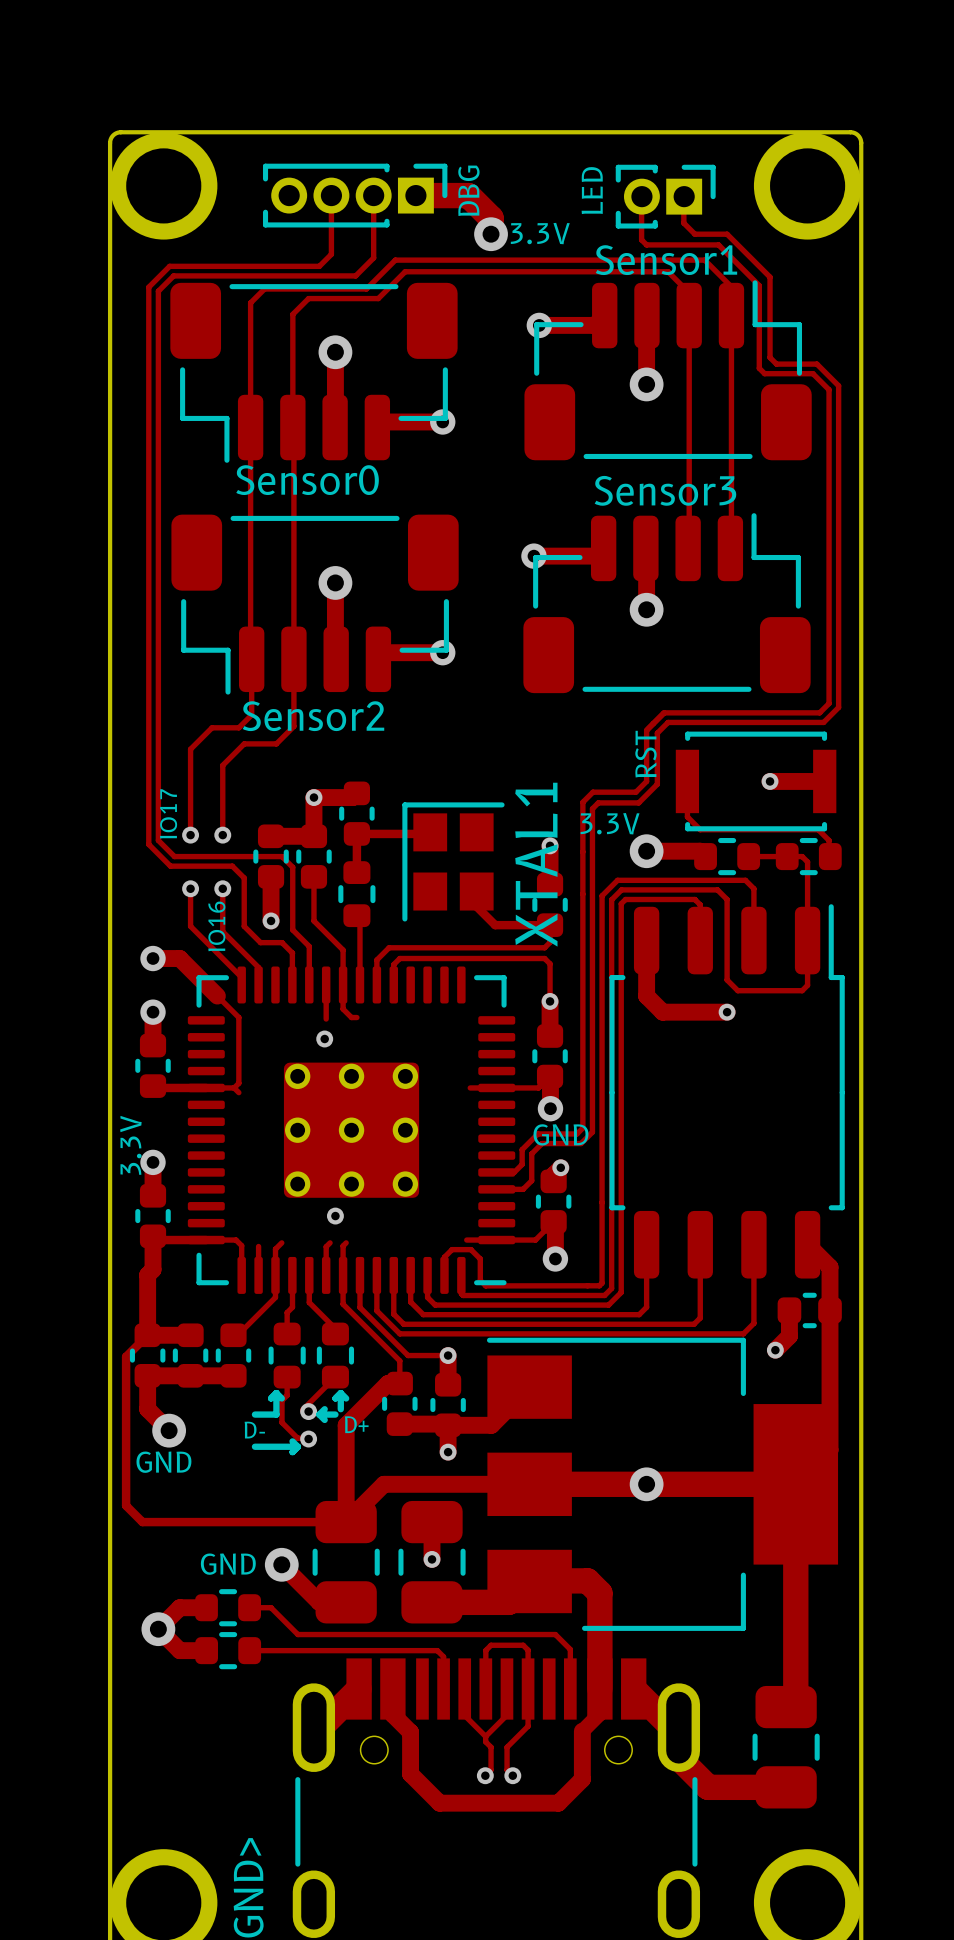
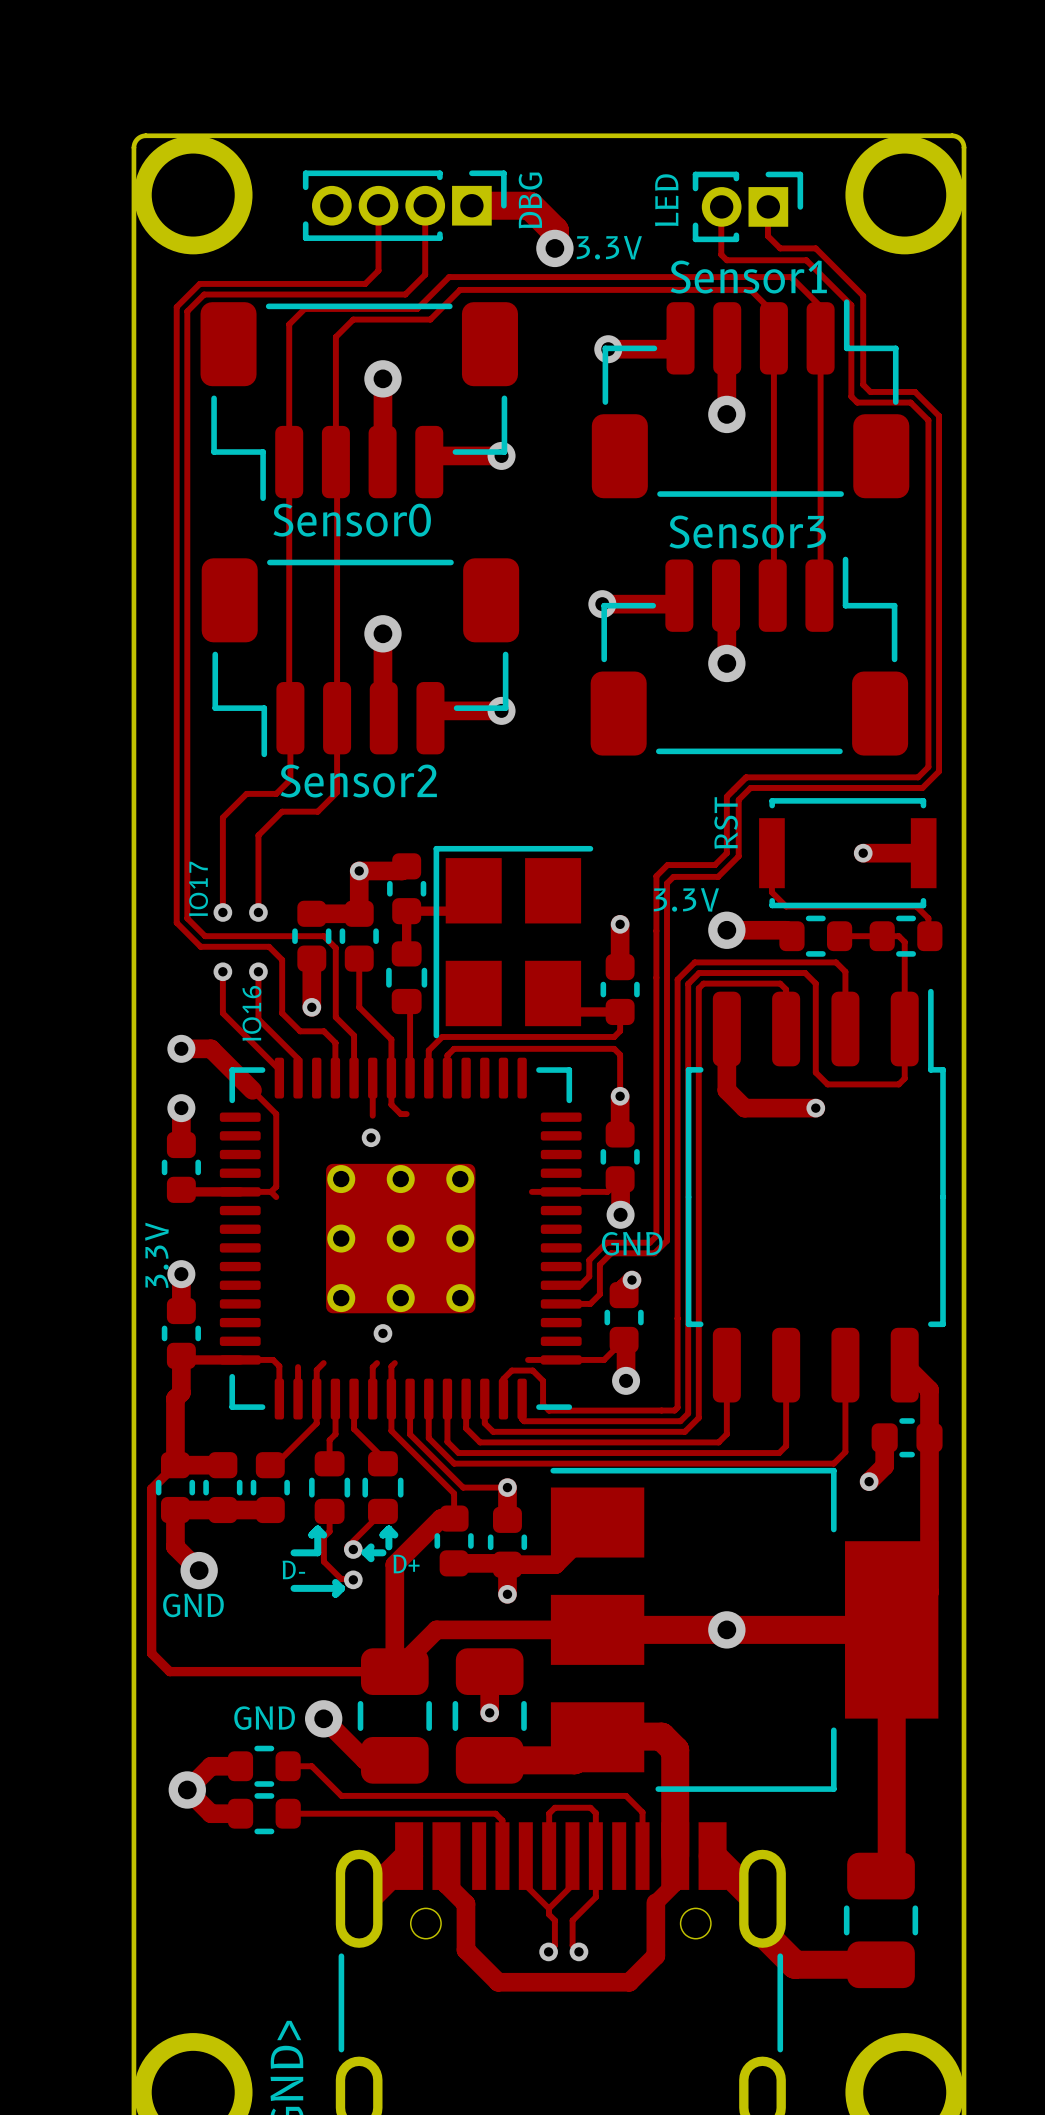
XTAL1: (453, 861) -> none
part: none -> (513, 942)

